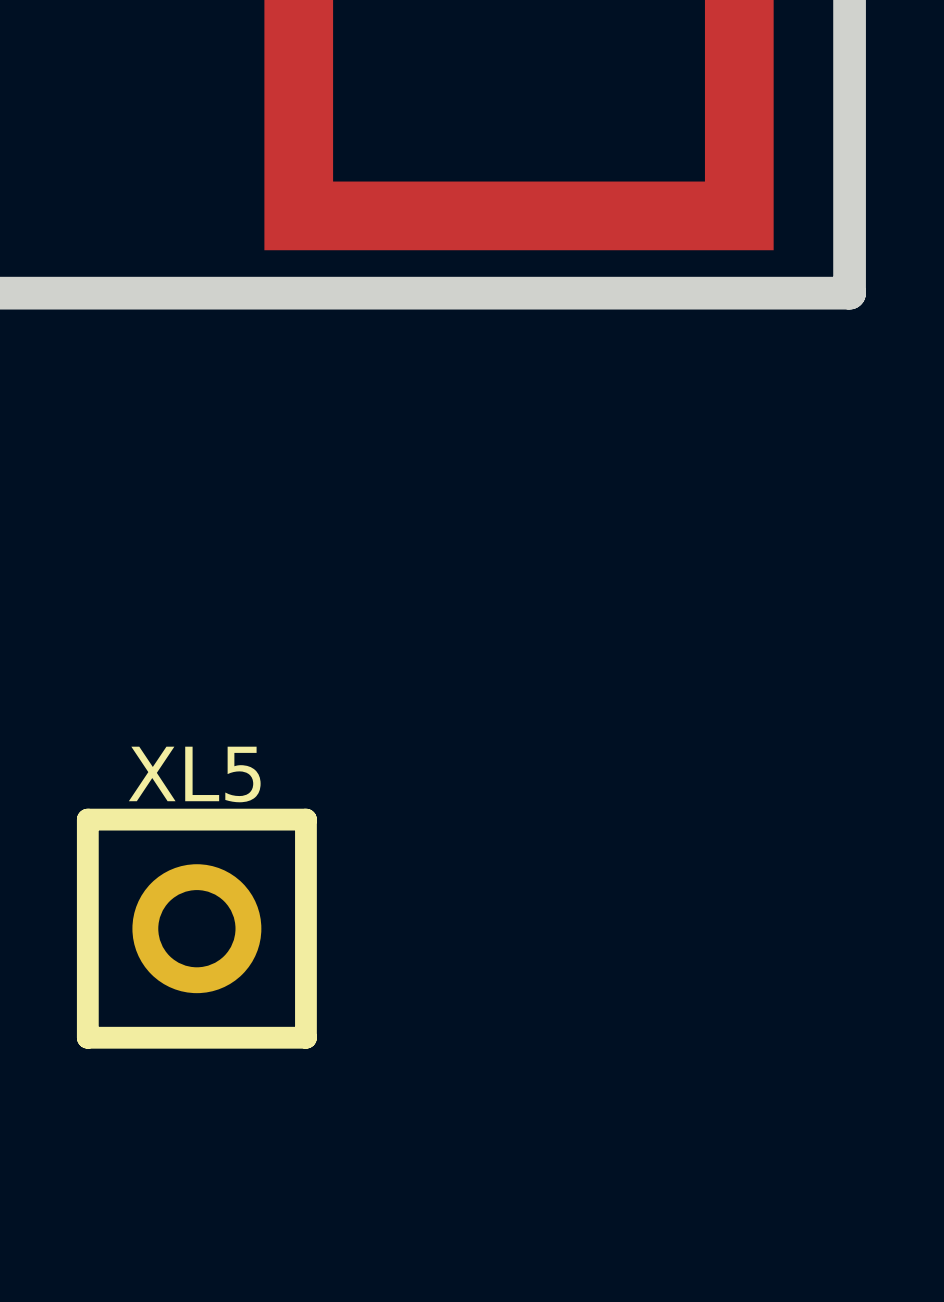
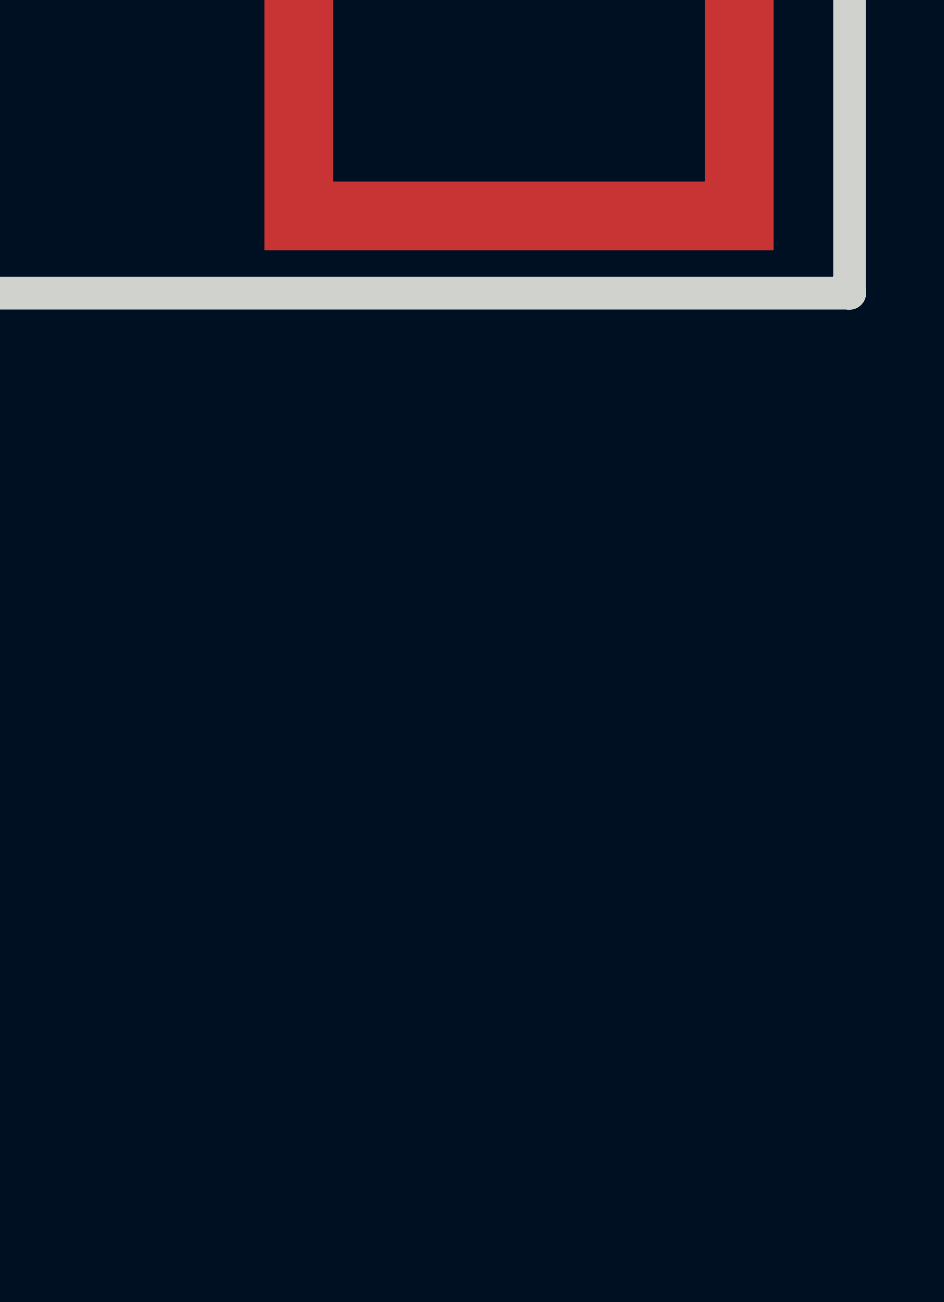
XL5: (196, 928) -> none

